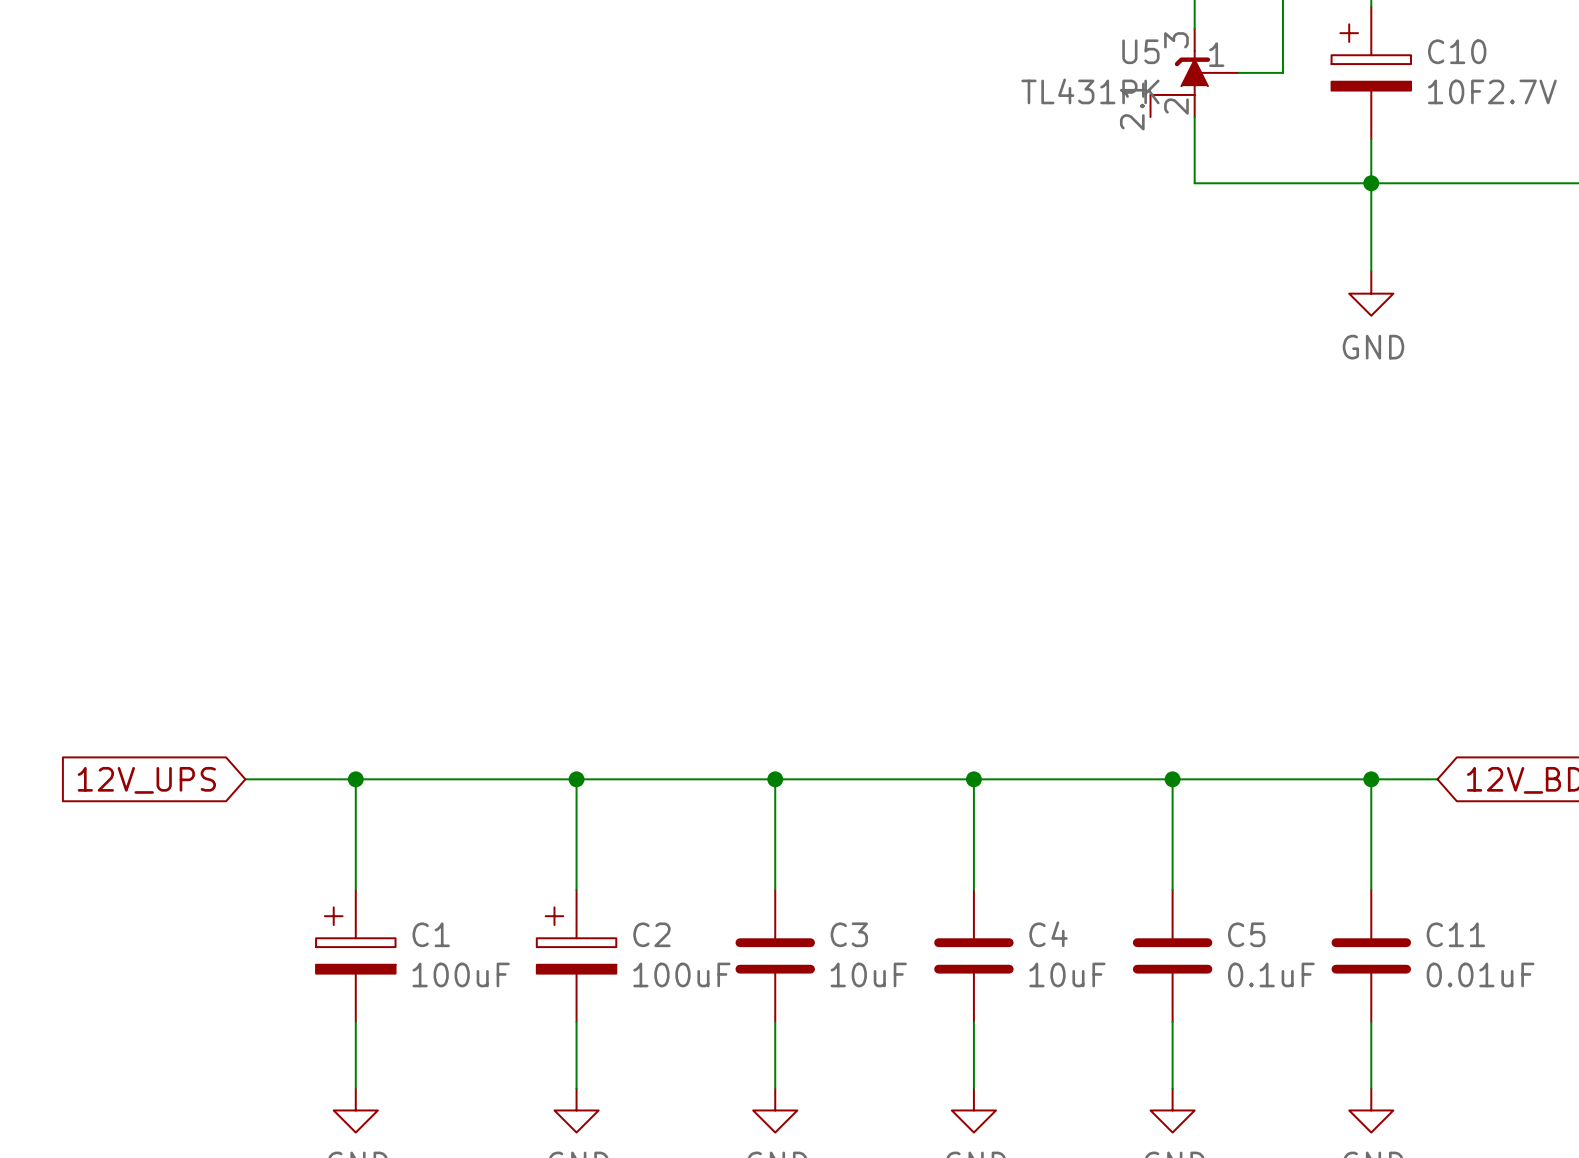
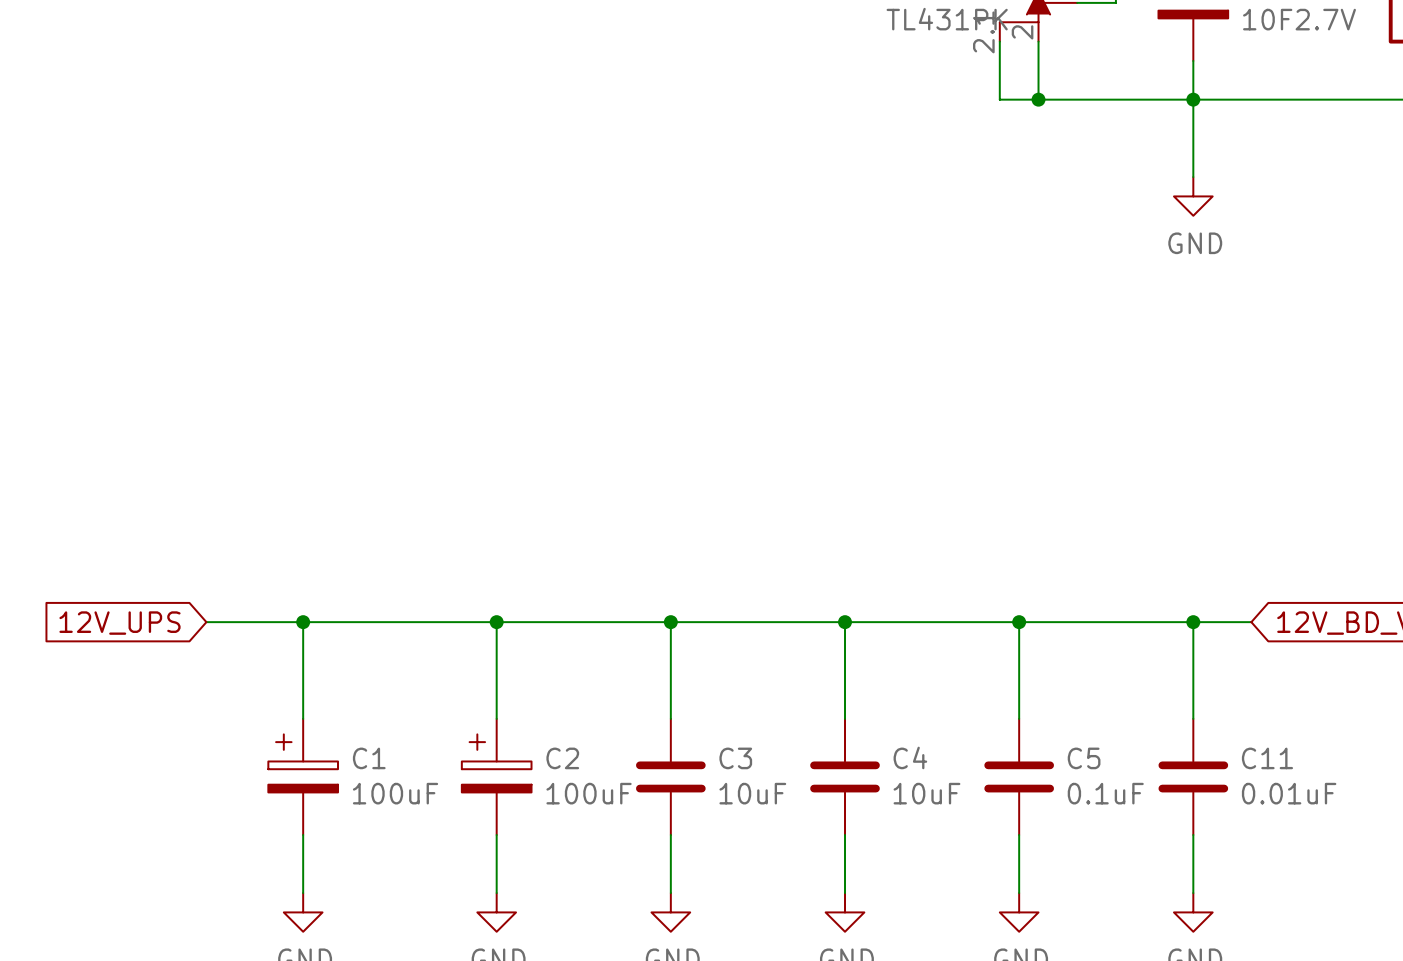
wire: none -> (999, 41) (999, 99) (1038, 99)
junction: none -> (1038, 99)

